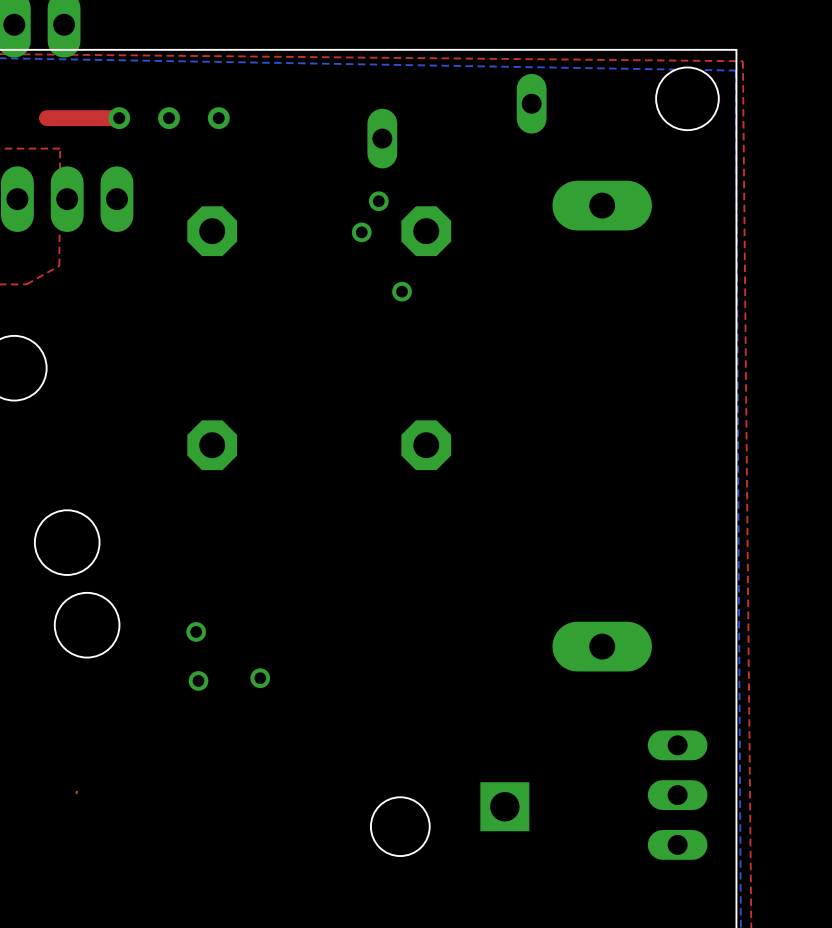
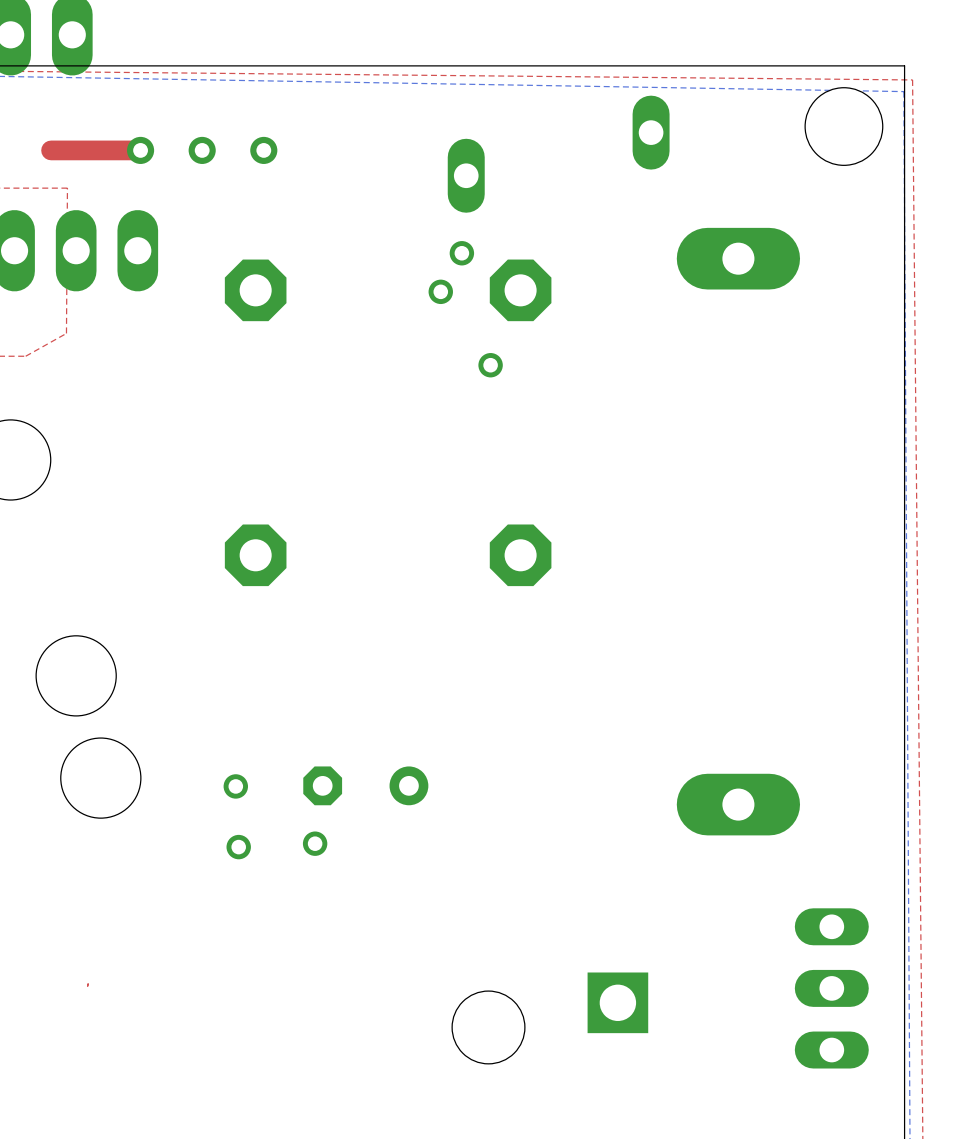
part: none -> (365, 785)

